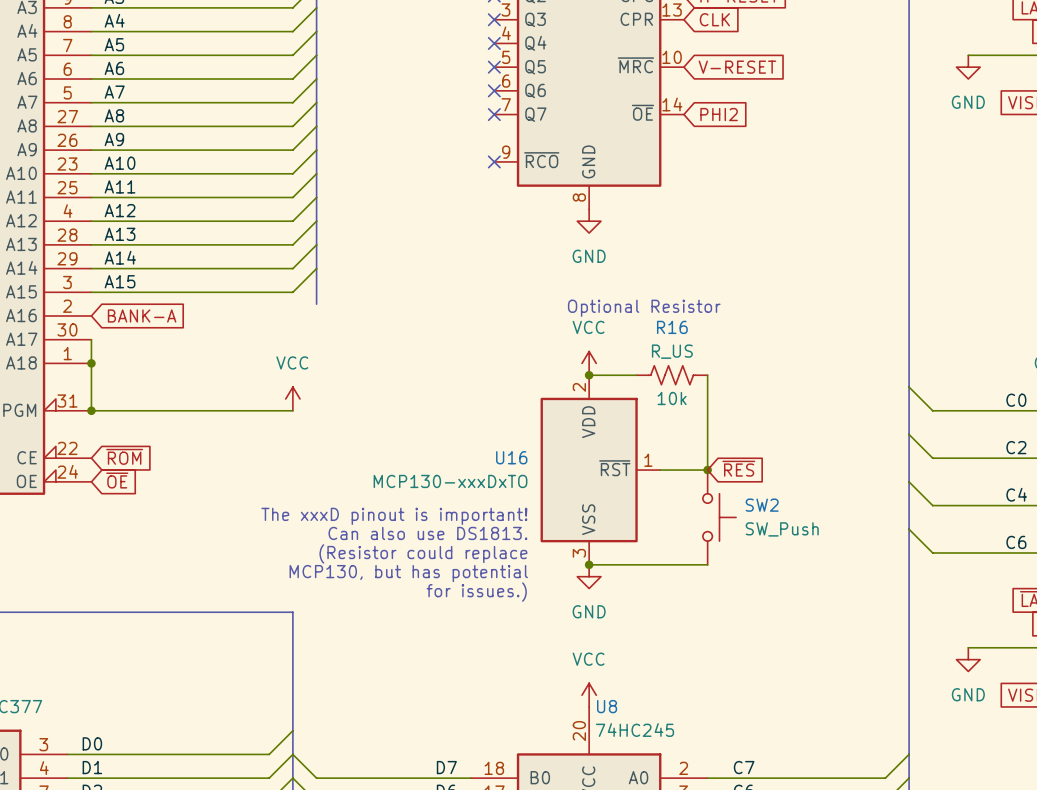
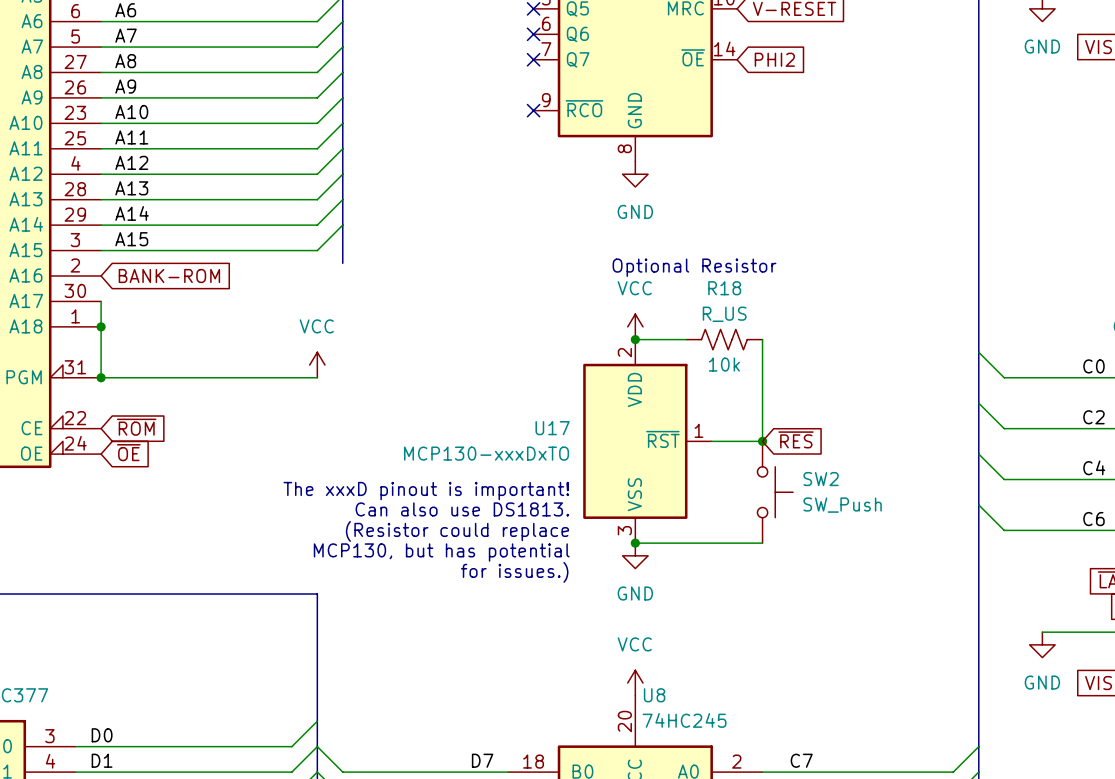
global label: BANK-A (142, 315) -> BANK-ROM (169, 276)
R16 name: R16 (672, 327) -> R18 (724, 288)
U16 name: U16 (511, 457) -> U17 (552, 428)

